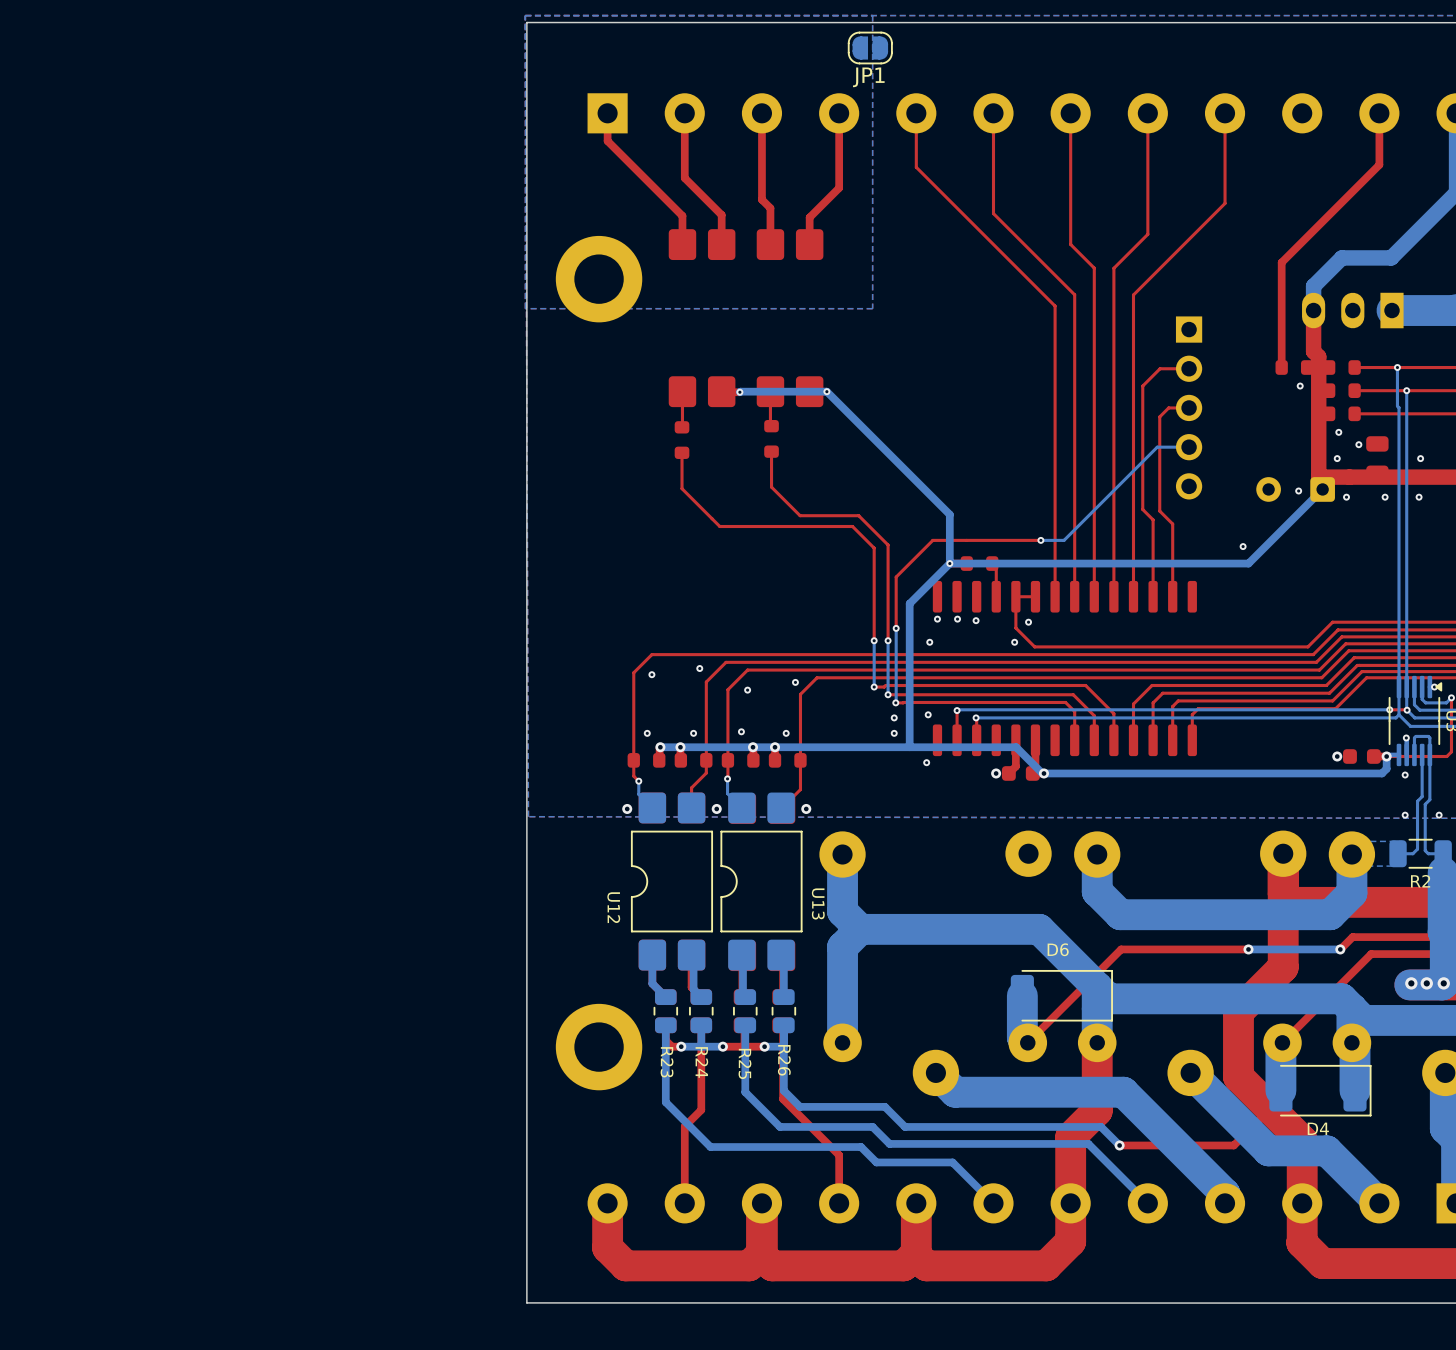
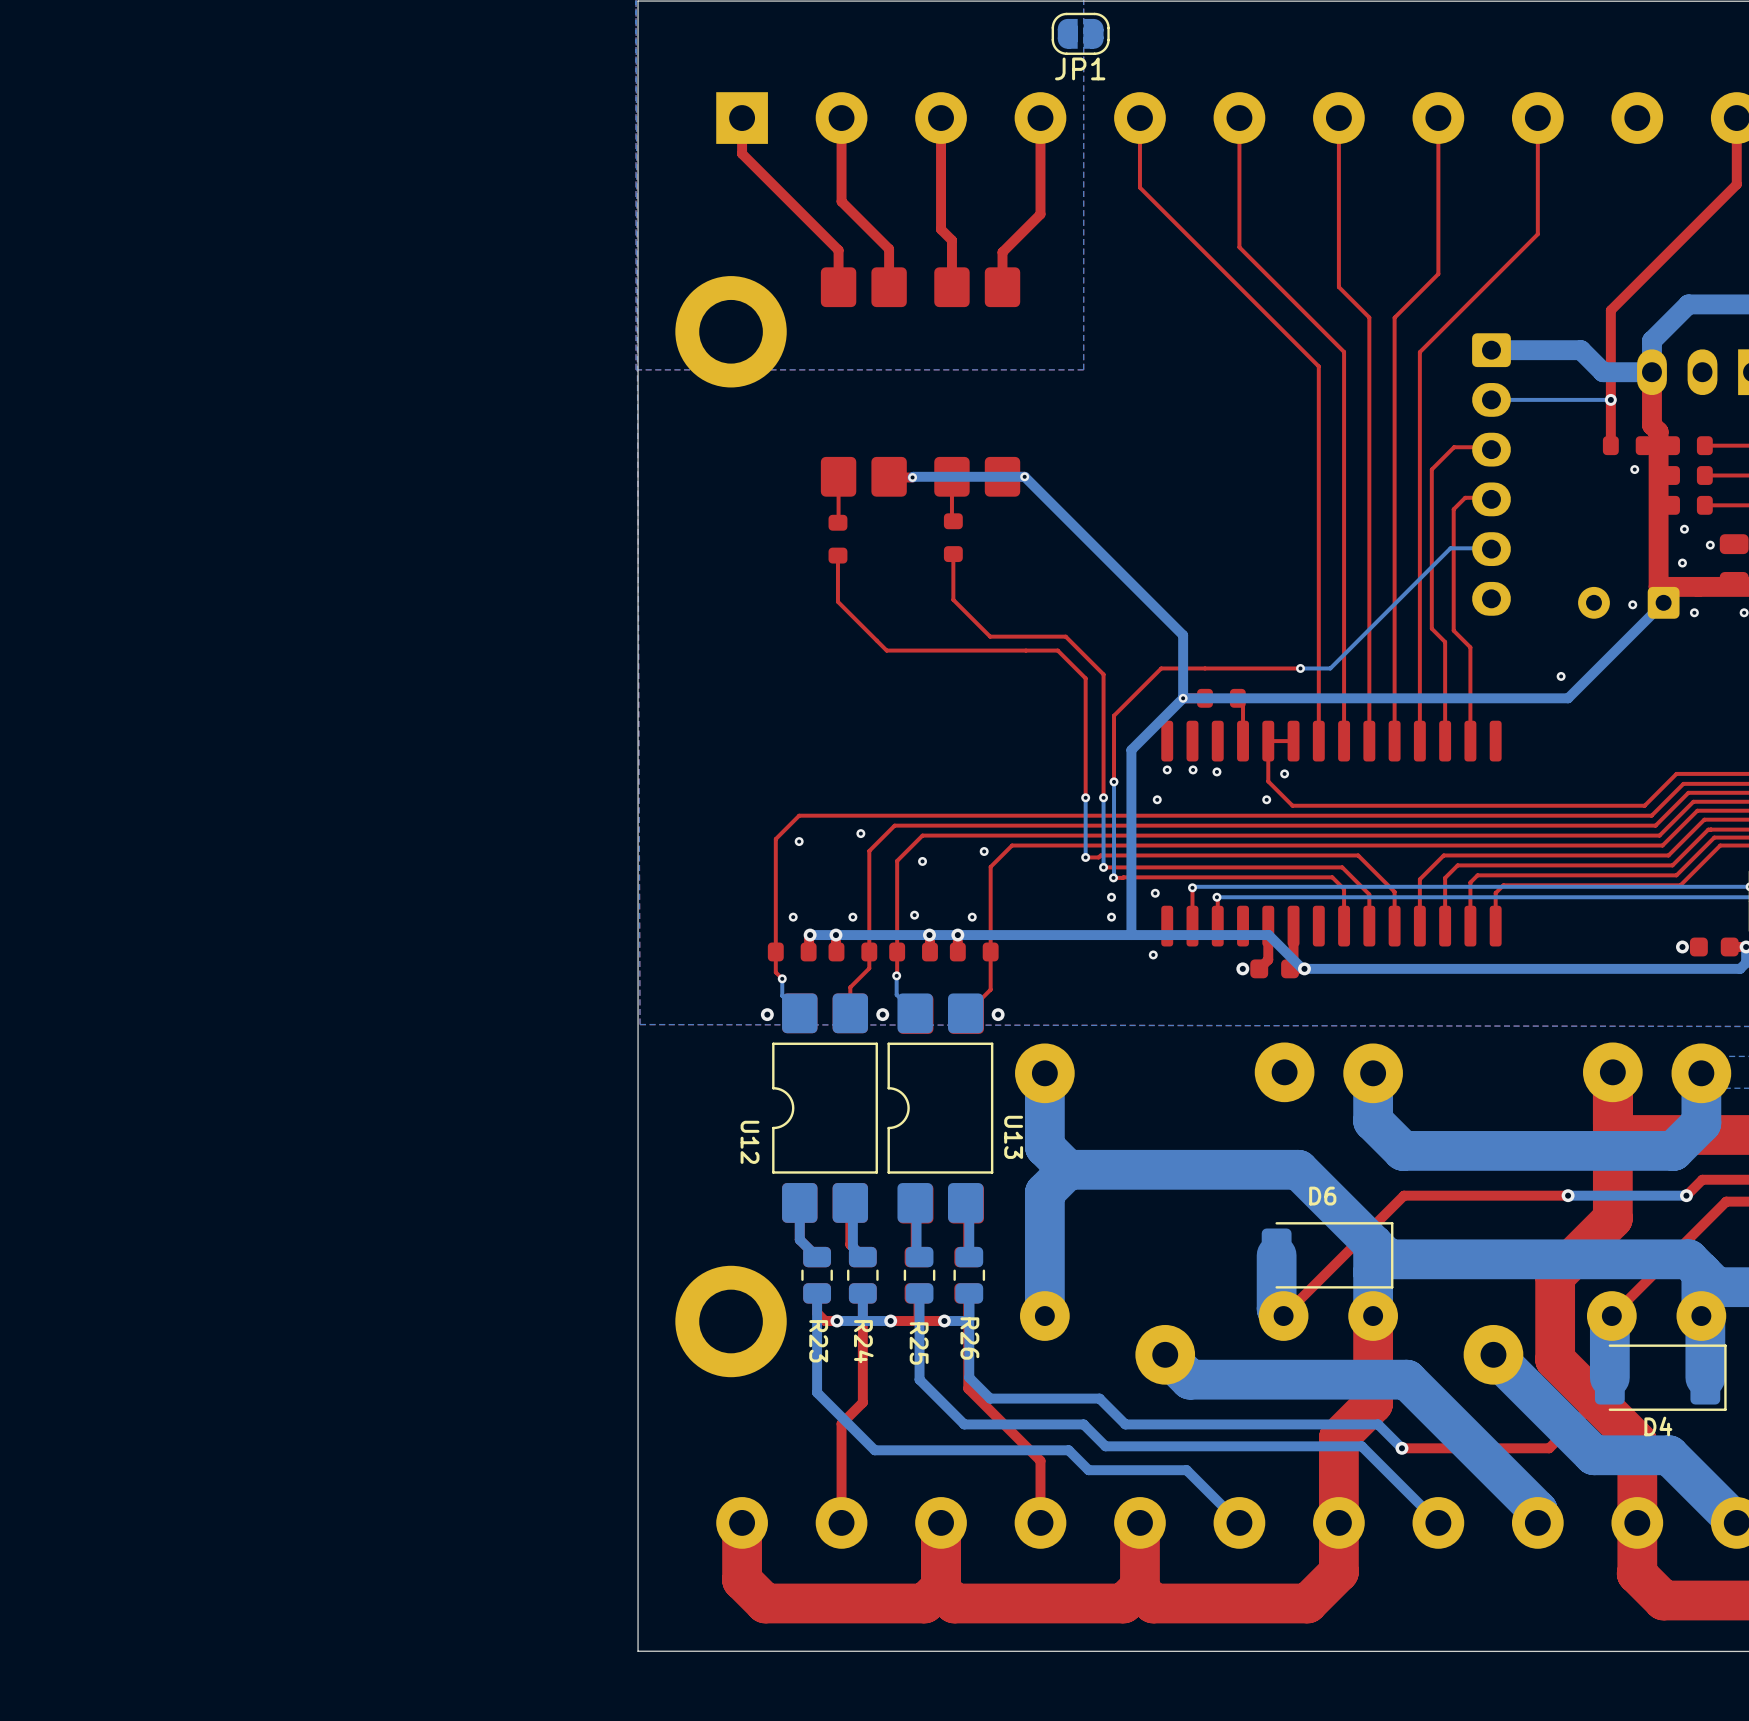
bottom track: none -> (1491, 350) (1581, 350) (1603, 372) (1651, 372)
bottom track: none -> (1610, 399) (1491, 399)
via: none -> (1610, 399)
part: none -> (1491, 474)
part: (1189, 407) -> none

